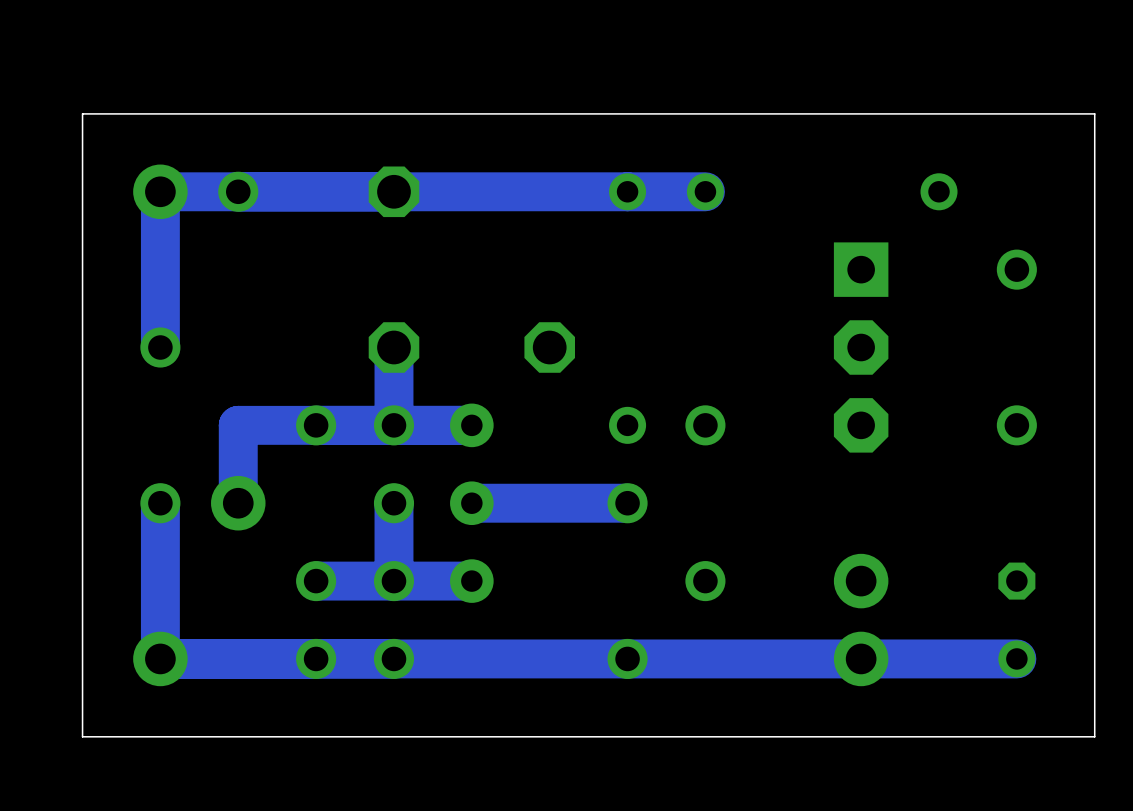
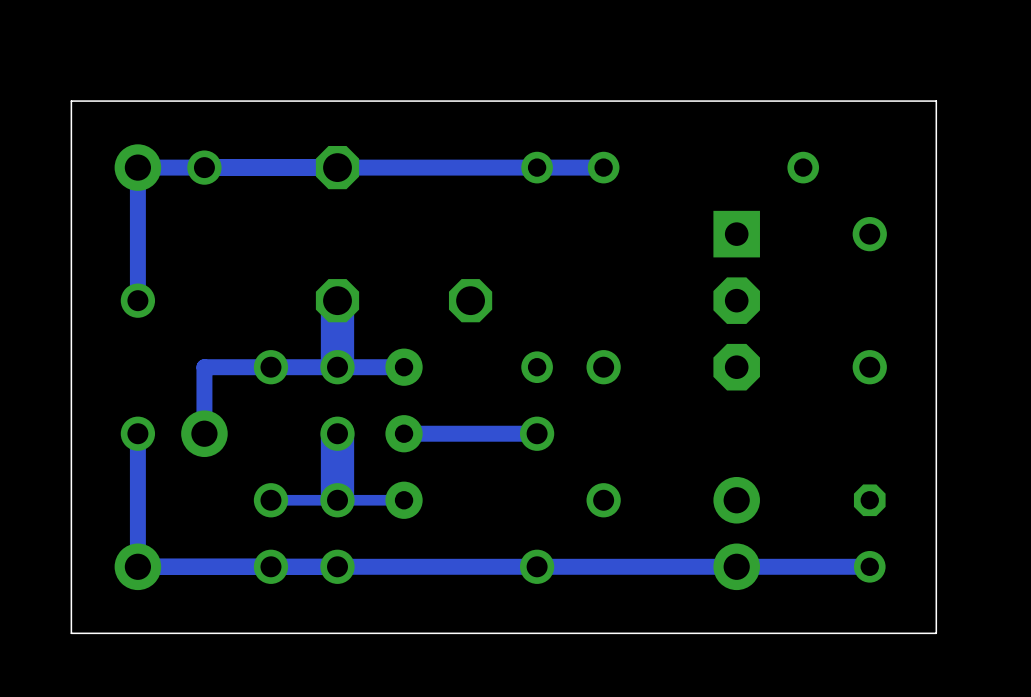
bottom track width: thick (705, 191) (160, 191) (160, 347) -> thin (603, 167) (137, 167) (137, 300)
bottom track width: thick (471, 425) (238, 425) (238, 503) -> thin (404, 367) (204, 367) (204, 433)
bottom track width: thick (160, 503) (160, 658) (1016, 658) -> thin (137, 433) (137, 566) (869, 566)
bottom track width: thick (627, 503) (471, 503) -> thin (537, 433) (404, 433)
bottom track width: thick (471, 581) (316, 581) -> thin (404, 500) (270, 500)

